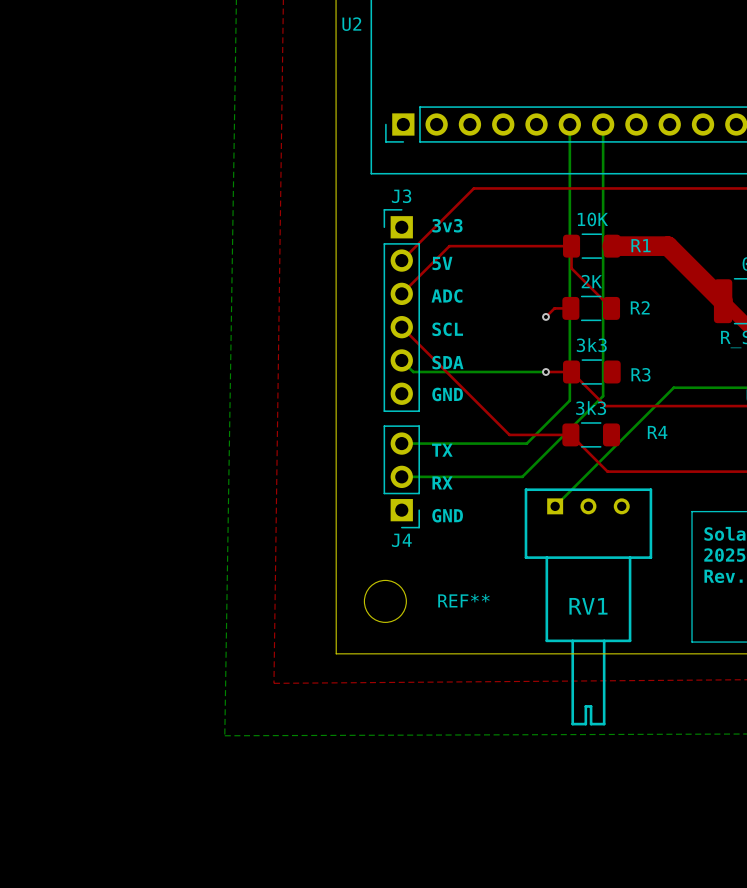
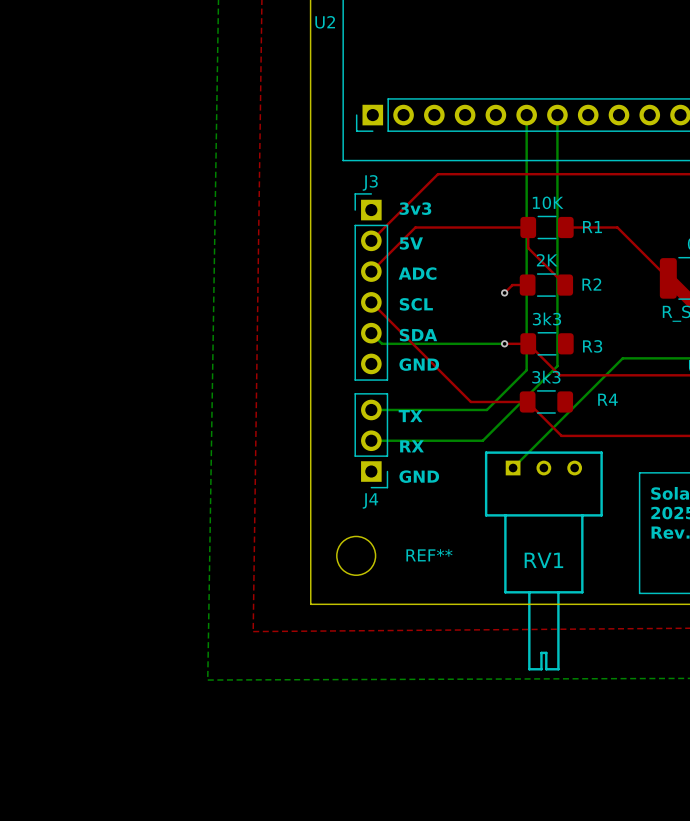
top track width: thick (612, 246) (668, 246) (723, 301) -> thin (565, 227) (617, 227) (668, 278)

